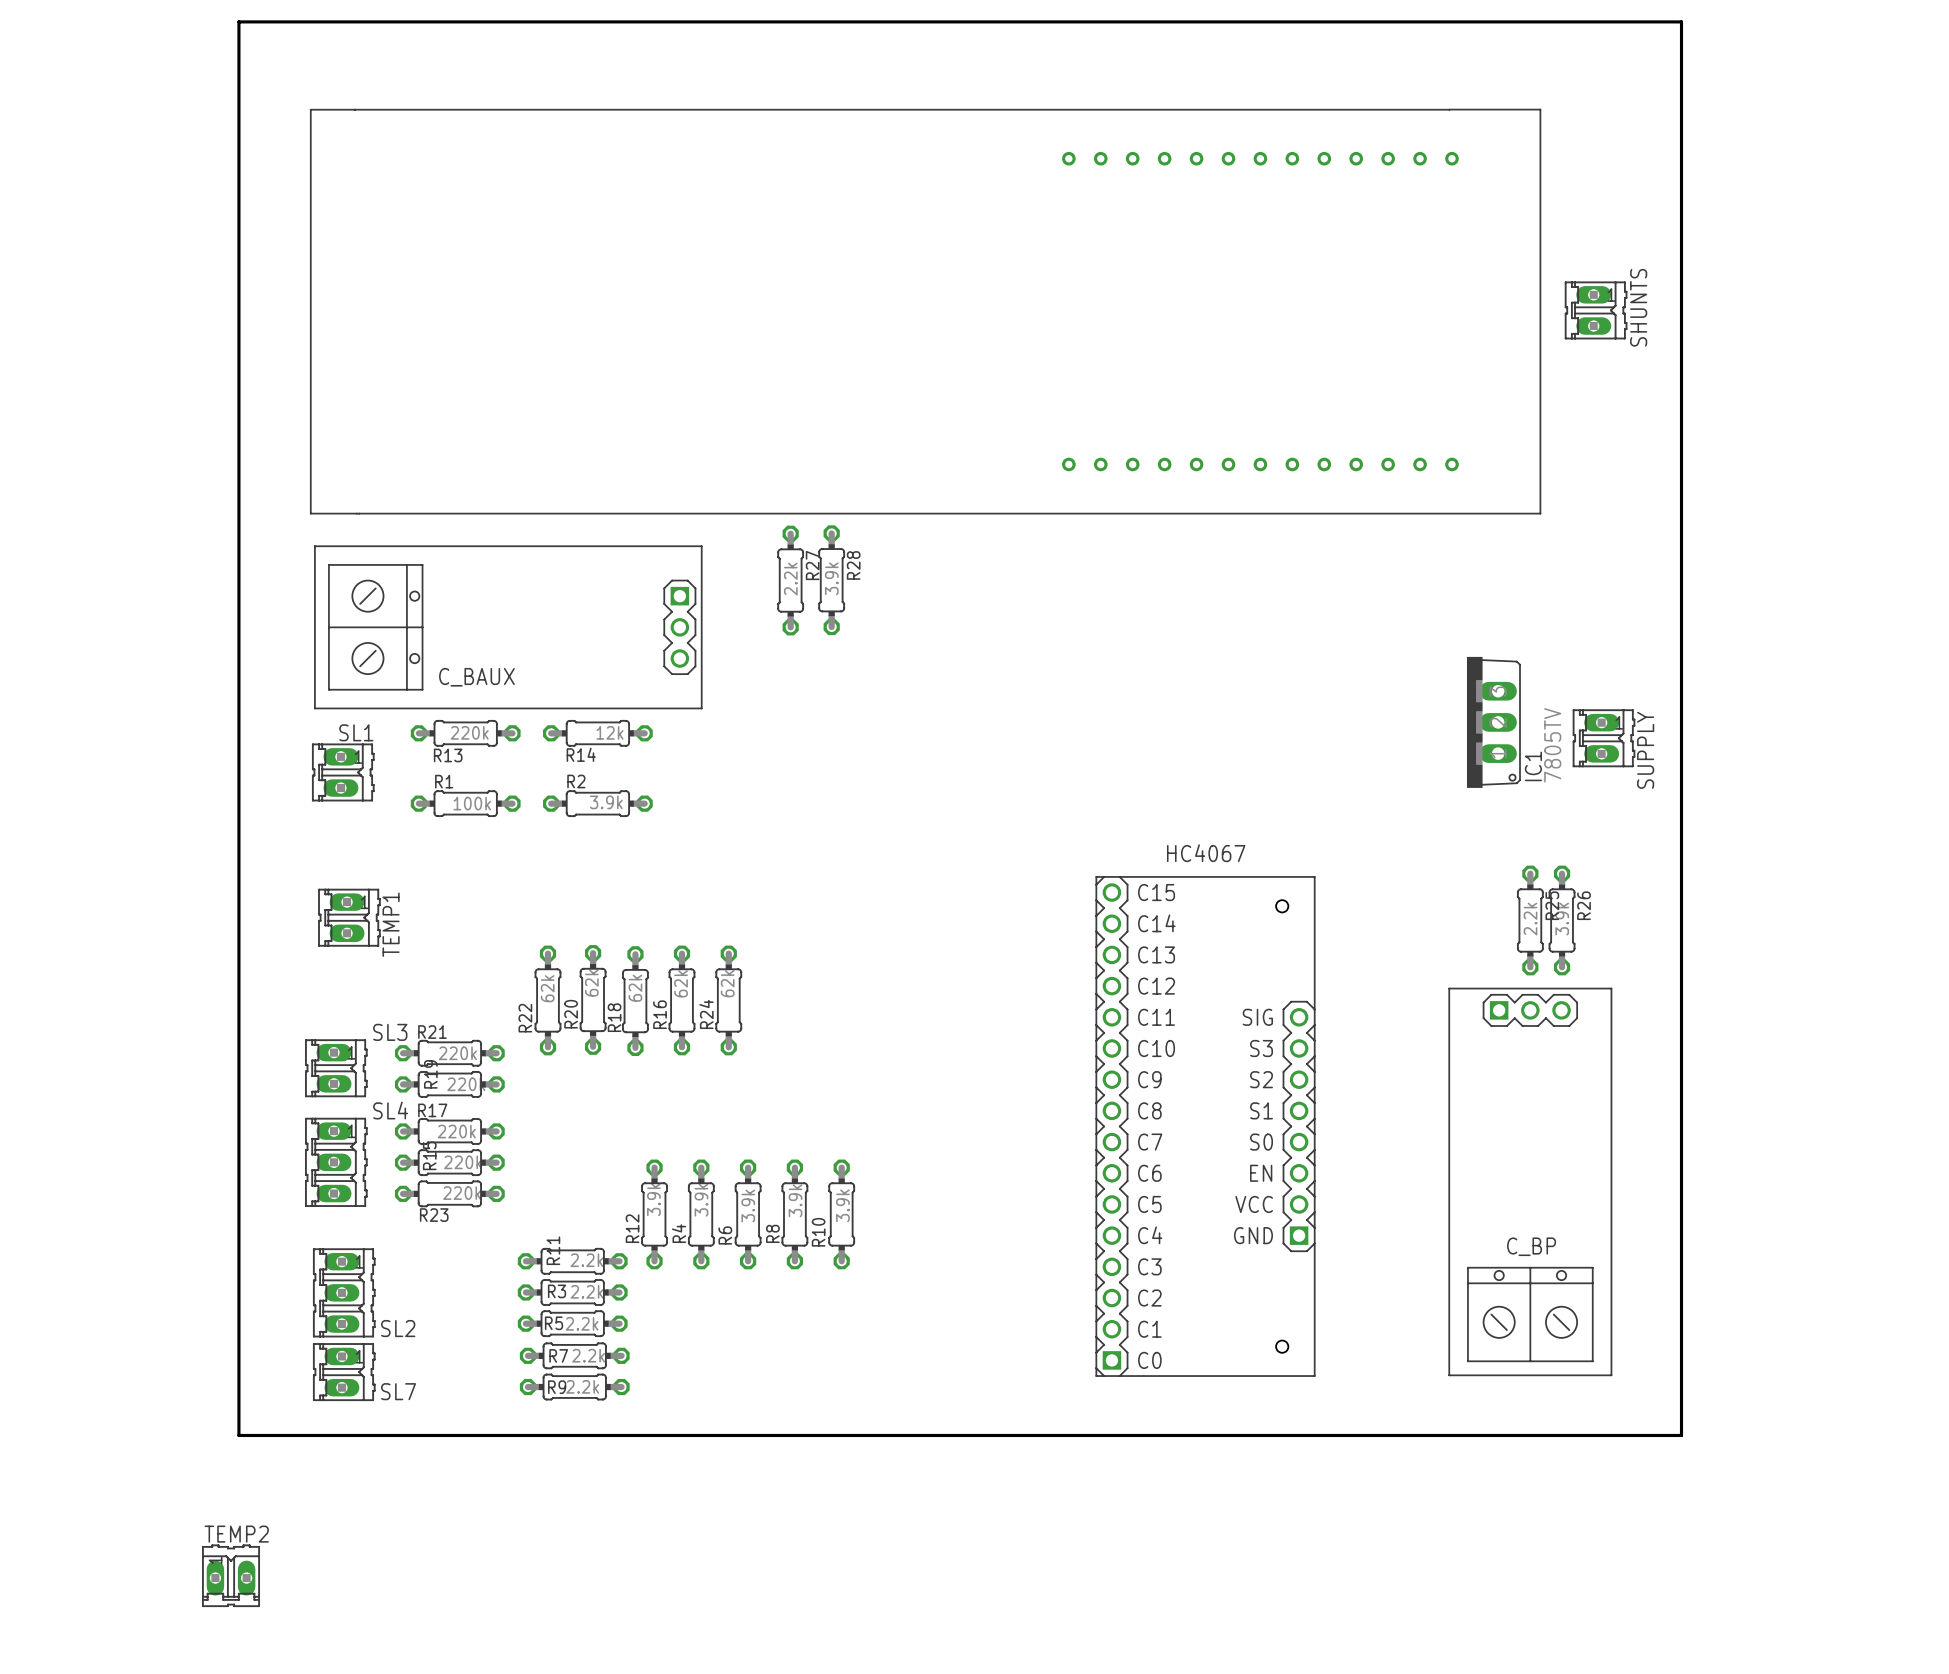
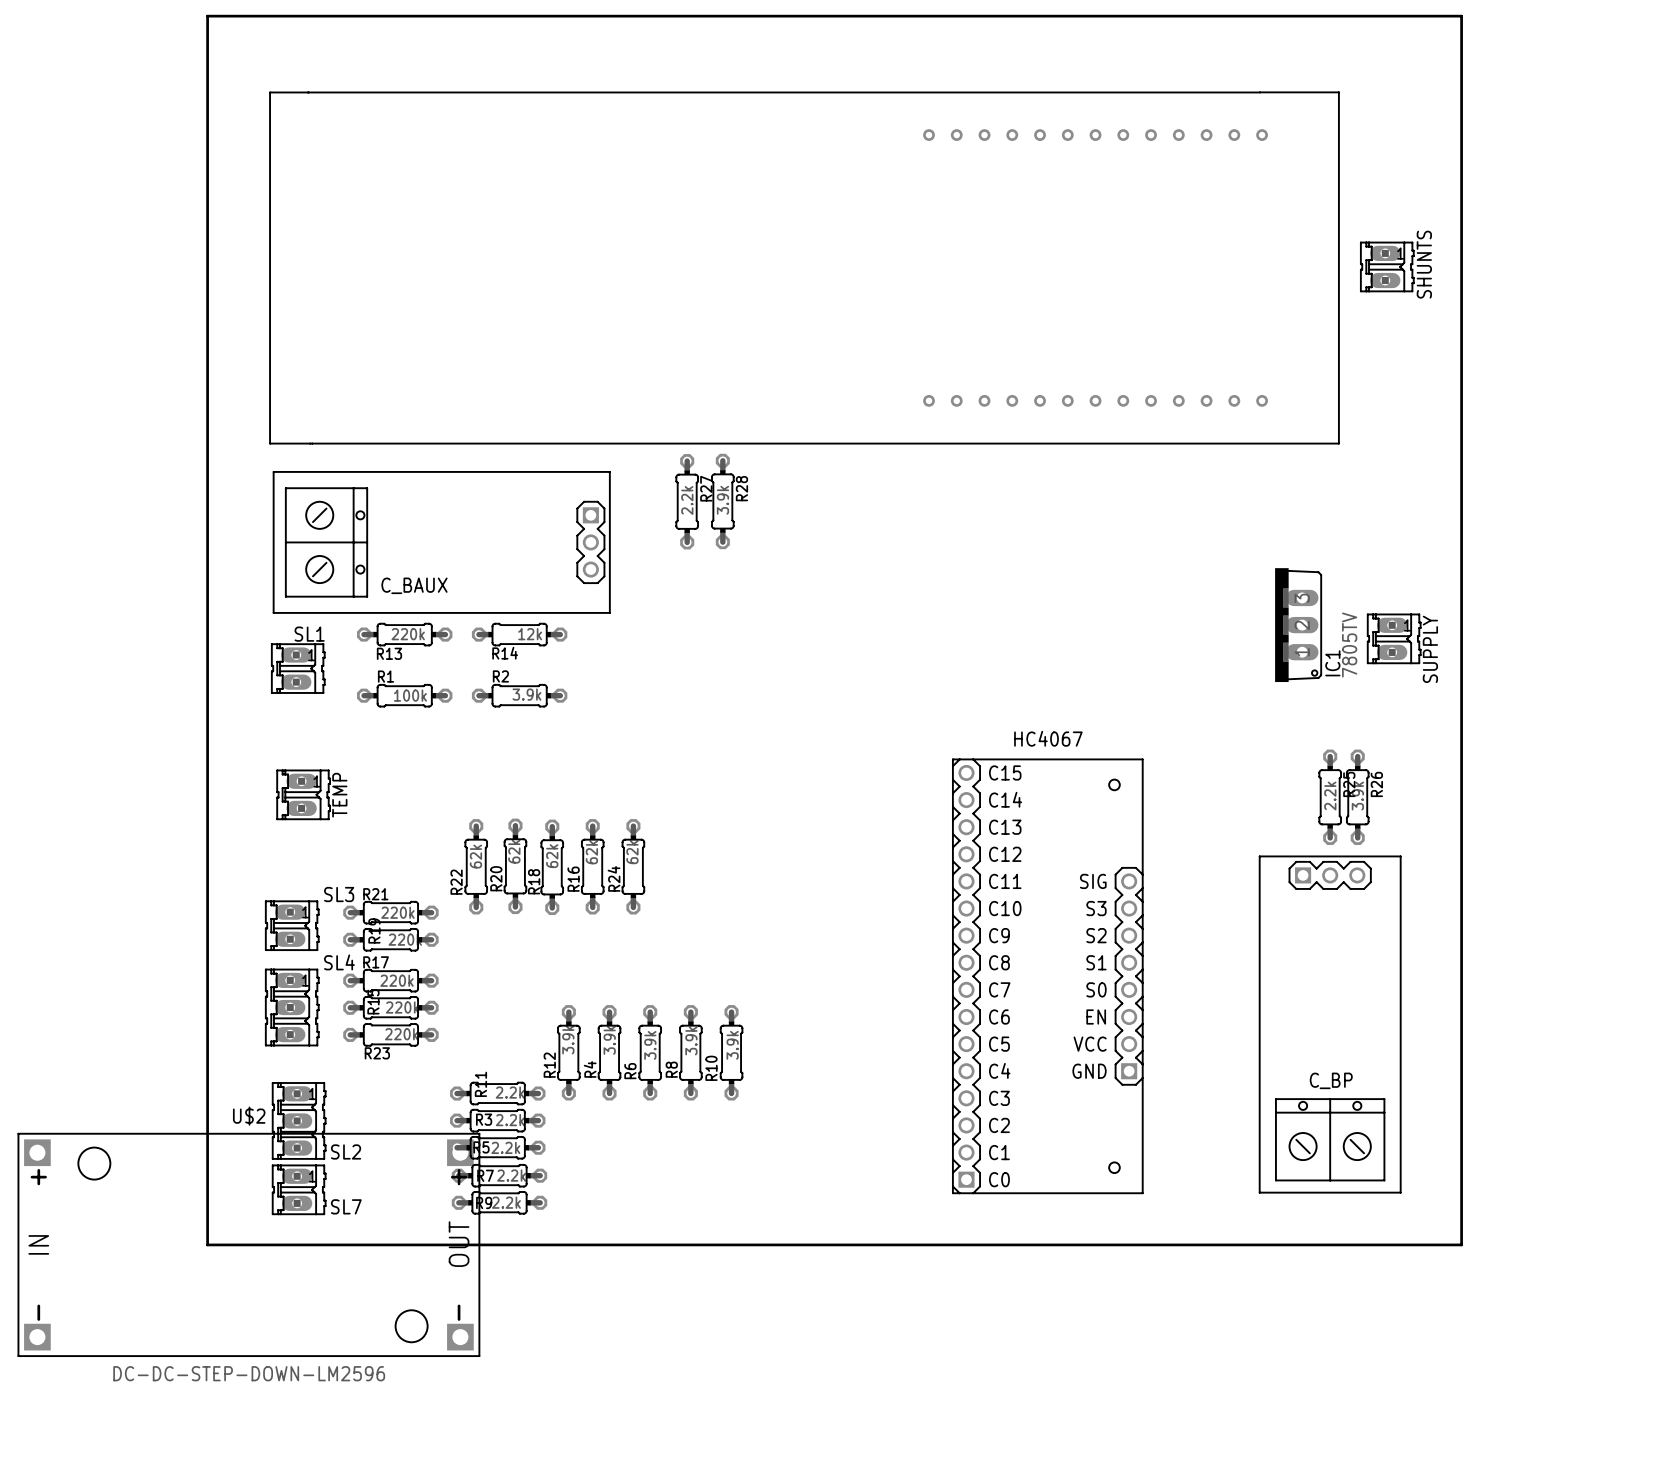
TEMP1 name: TEMP1 (391, 924) -> TEMP (339, 795)
U$2: none -> DC-DC-STEP-DOWN-LM2596 (248, 1244)
TEMP2: (231, 1575) -> none

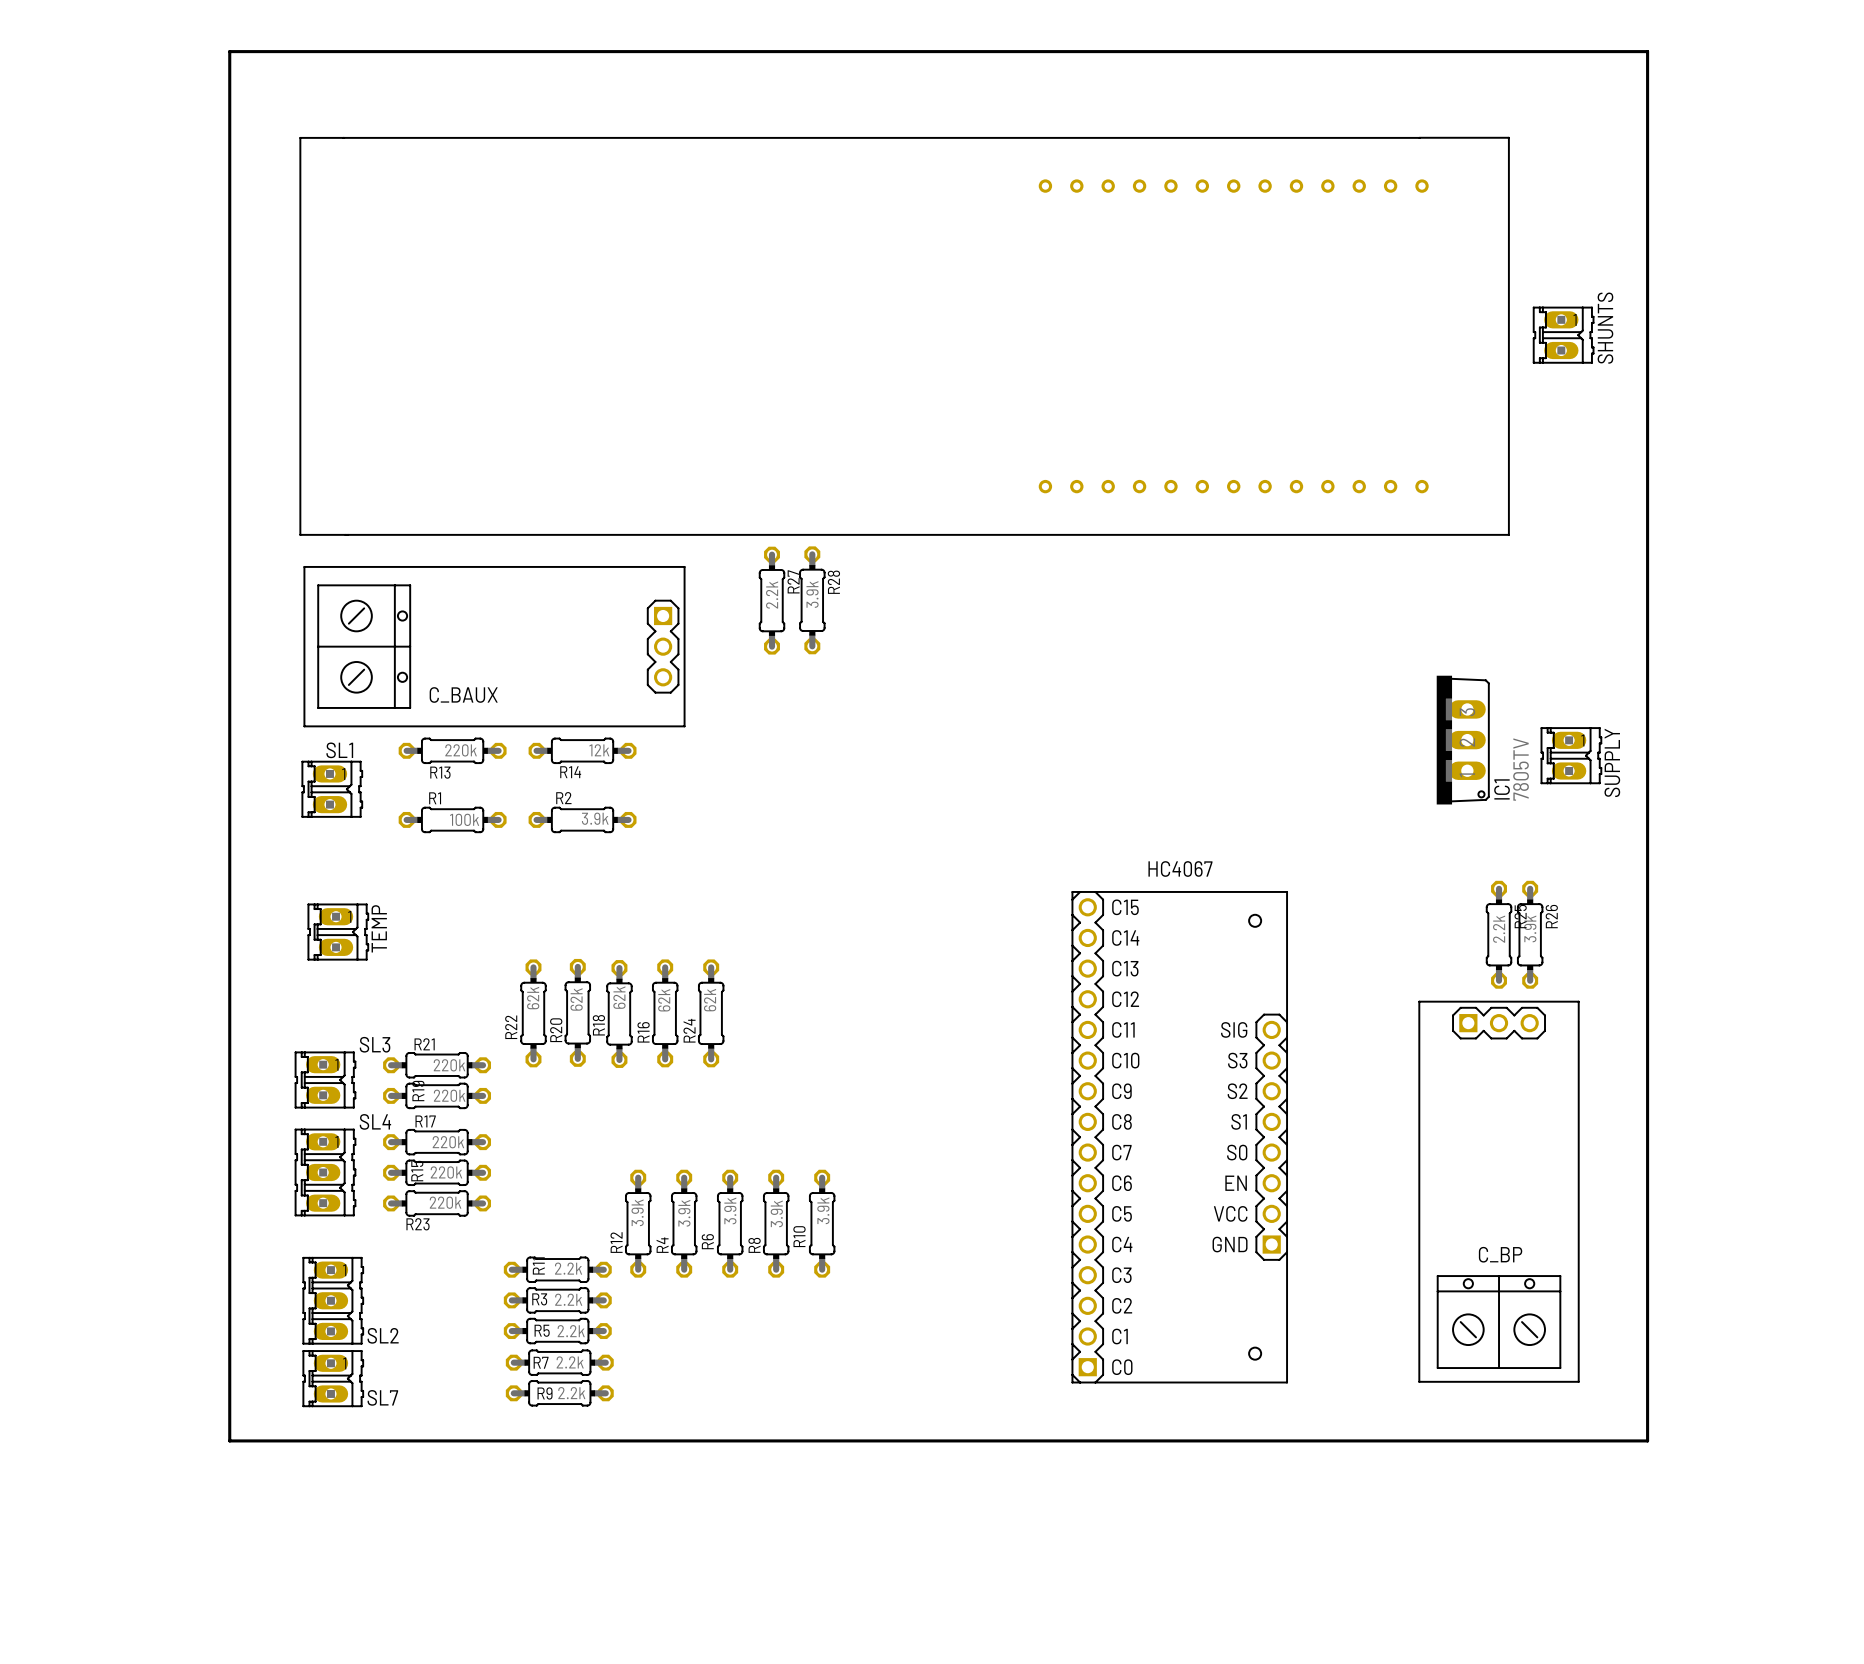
U$2: DC-DC-STEP-DOWN-LM2596 (248, 1244) -> none

